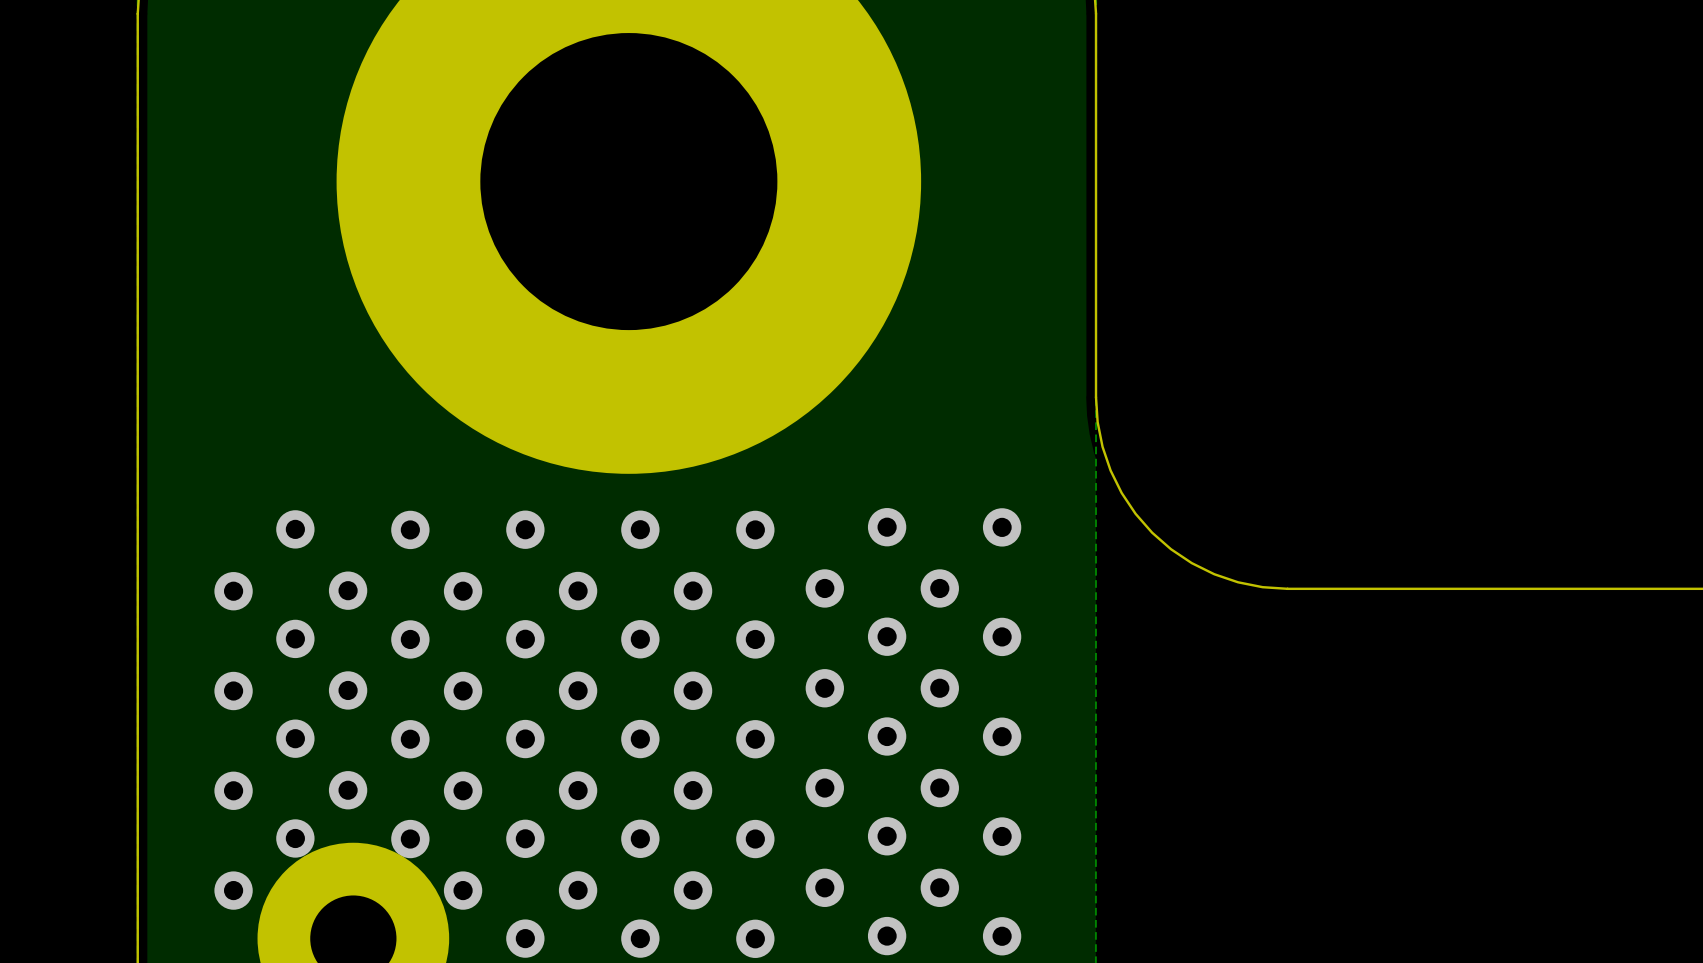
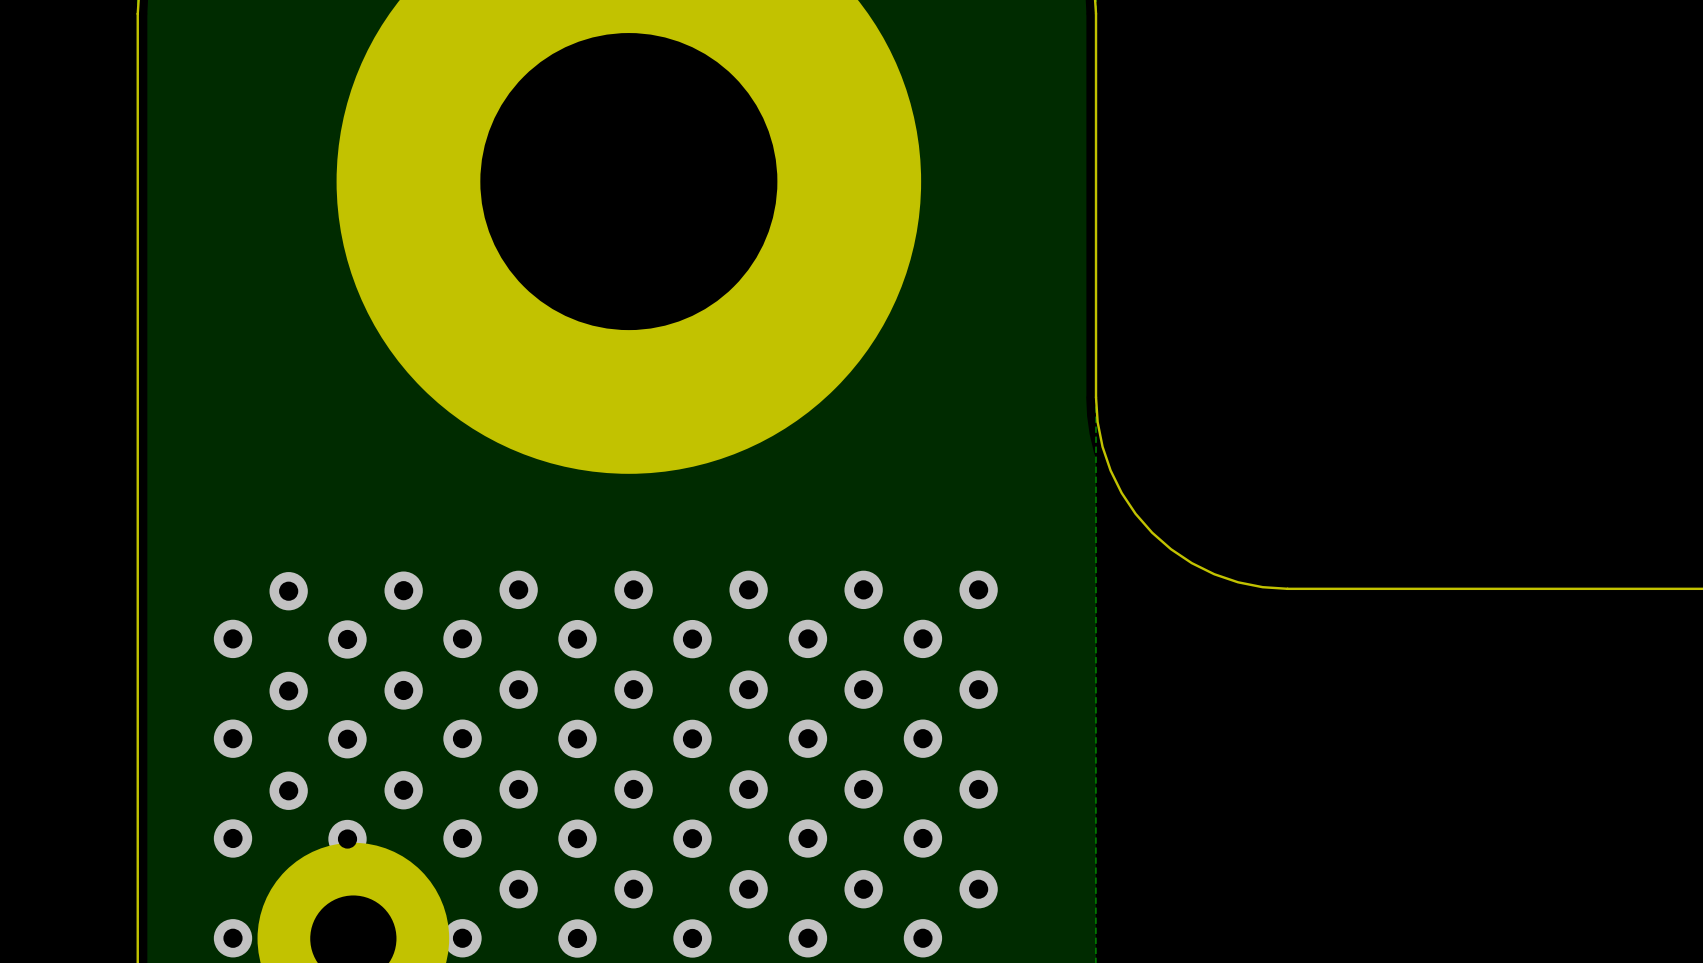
via: (887, 527) -> none
via: (1002, 527) -> none
via: (295, 529) -> none
via: (410, 529) -> none
via: (525, 529) -> none
via: (640, 529) -> none
via: (755, 529) -> none
via: (824, 588) -> none
via: (939, 588) -> none
via: none -> (518, 589)
via: none -> (633, 589)
via: none -> (748, 589)
via: none -> (863, 589)
via: none -> (978, 589)
via: (348, 590) -> none
via: none -> (403, 590)
via: (233, 591) -> none
via: none -> (288, 591)
via: (463, 591) -> none
via: (578, 591) -> none
via: (693, 591) -> none
via position: (887, 636) -> (922, 638)
via: (1002, 636) -> none
via: none -> (232, 638)
via: (295, 638) -> none
via: none -> (462, 638)
via: none -> (807, 638)
via: none -> (347, 639)
via: (410, 639) -> none
via: (525, 639) -> none
via: none -> (577, 639)
via: (640, 639) -> none
via: none -> (692, 639)
via: (755, 639) -> none
via: (824, 688) -> none
via: (939, 688) -> none
via: none -> (518, 689)
via: none -> (633, 689)
via: none -> (748, 689)
via: none -> (863, 689)
via: none -> (978, 689)
via: (348, 690) -> none
via: none -> (403, 690)
via: (578, 690) -> none
via: (693, 690) -> none
via: (233, 691) -> none
via: none -> (288, 691)
via: (463, 691) -> none
via position: (887, 736) -> (922, 738)
via: (1002, 736) -> none
via: none -> (232, 738)
via: (295, 738) -> none
via: none -> (462, 738)
via: none -> (577, 738)
via: none -> (692, 738)
via: none -> (807, 738)
via: none -> (347, 739)
via: (410, 739) -> none
via: (525, 739) -> none
via: (640, 739) -> none
via: (755, 739) -> none
via: (824, 788) -> none
via: (939, 788) -> none
via: none -> (518, 789)
via: none -> (633, 789)
via: none -> (748, 789)
via: none -> (863, 789)
via: none -> (978, 789)
via: (233, 790) -> none
via: none -> (288, 790)
via: (348, 790) -> none
via: none -> (403, 790)
via: (463, 790) -> none
via: (578, 790) -> none
via: (693, 790) -> none
via position: (887, 836) -> (922, 838)
via: (1002, 836) -> none
via: none -> (232, 838)
via: (295, 838) -> none
via: none -> (462, 838)
via: (525, 838) -> none
via: none -> (577, 838)
via: (640, 838) -> none
via: none -> (692, 838)
via: none -> (807, 838)
via: none -> (347, 839)
via: (410, 839) -> none
via: (755, 839) -> none
via: (824, 887) -> none
via: (939, 887) -> none
via: none -> (518, 889)
via: none -> (633, 889)
via: none -> (748, 889)
via: none -> (863, 889)
via: none -> (978, 889)
via: (233, 890) -> none
via: (463, 890) -> none
via: (578, 890) -> none
via: (693, 890) -> none
via position: (887, 936) -> (922, 938)
via: (1002, 936) -> none
via: none -> (232, 938)
via: none -> (462, 938)
via: (525, 938) -> none
via: none -> (577, 938)
via: (640, 938) -> none
via: none -> (692, 938)
via: (755, 938) -> none
via: none -> (807, 938)

